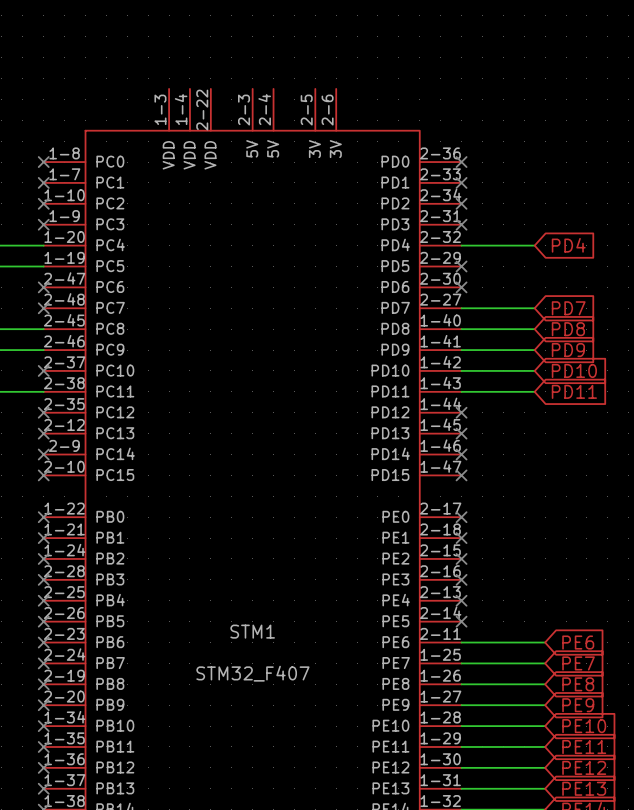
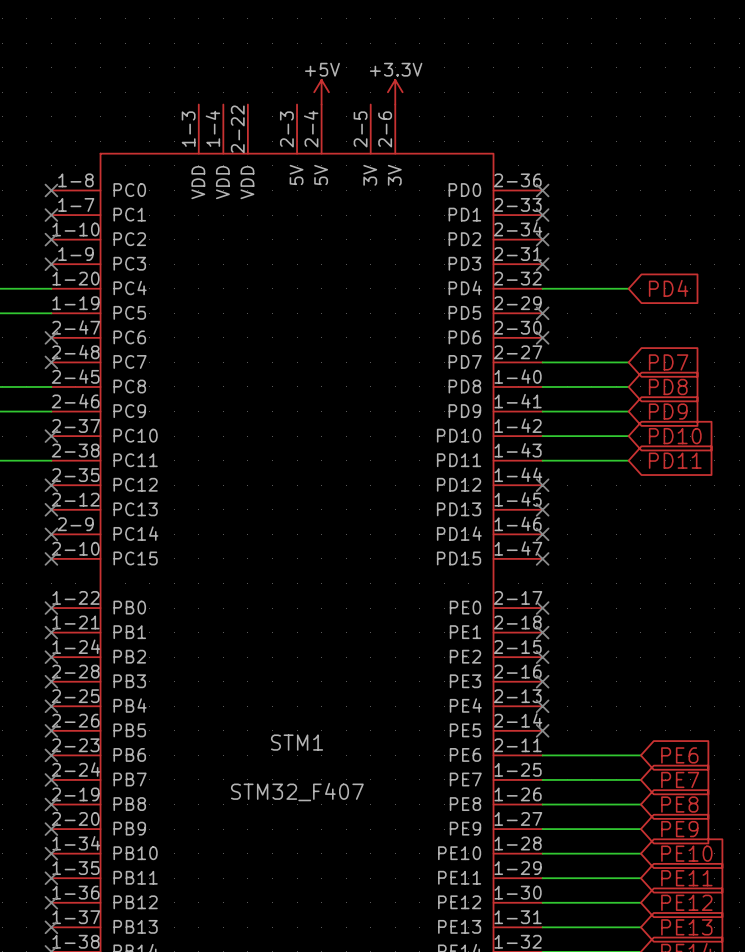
power symbol: none -> +5V (321, 92)
power symbol: none -> +3.3V (395, 92)

